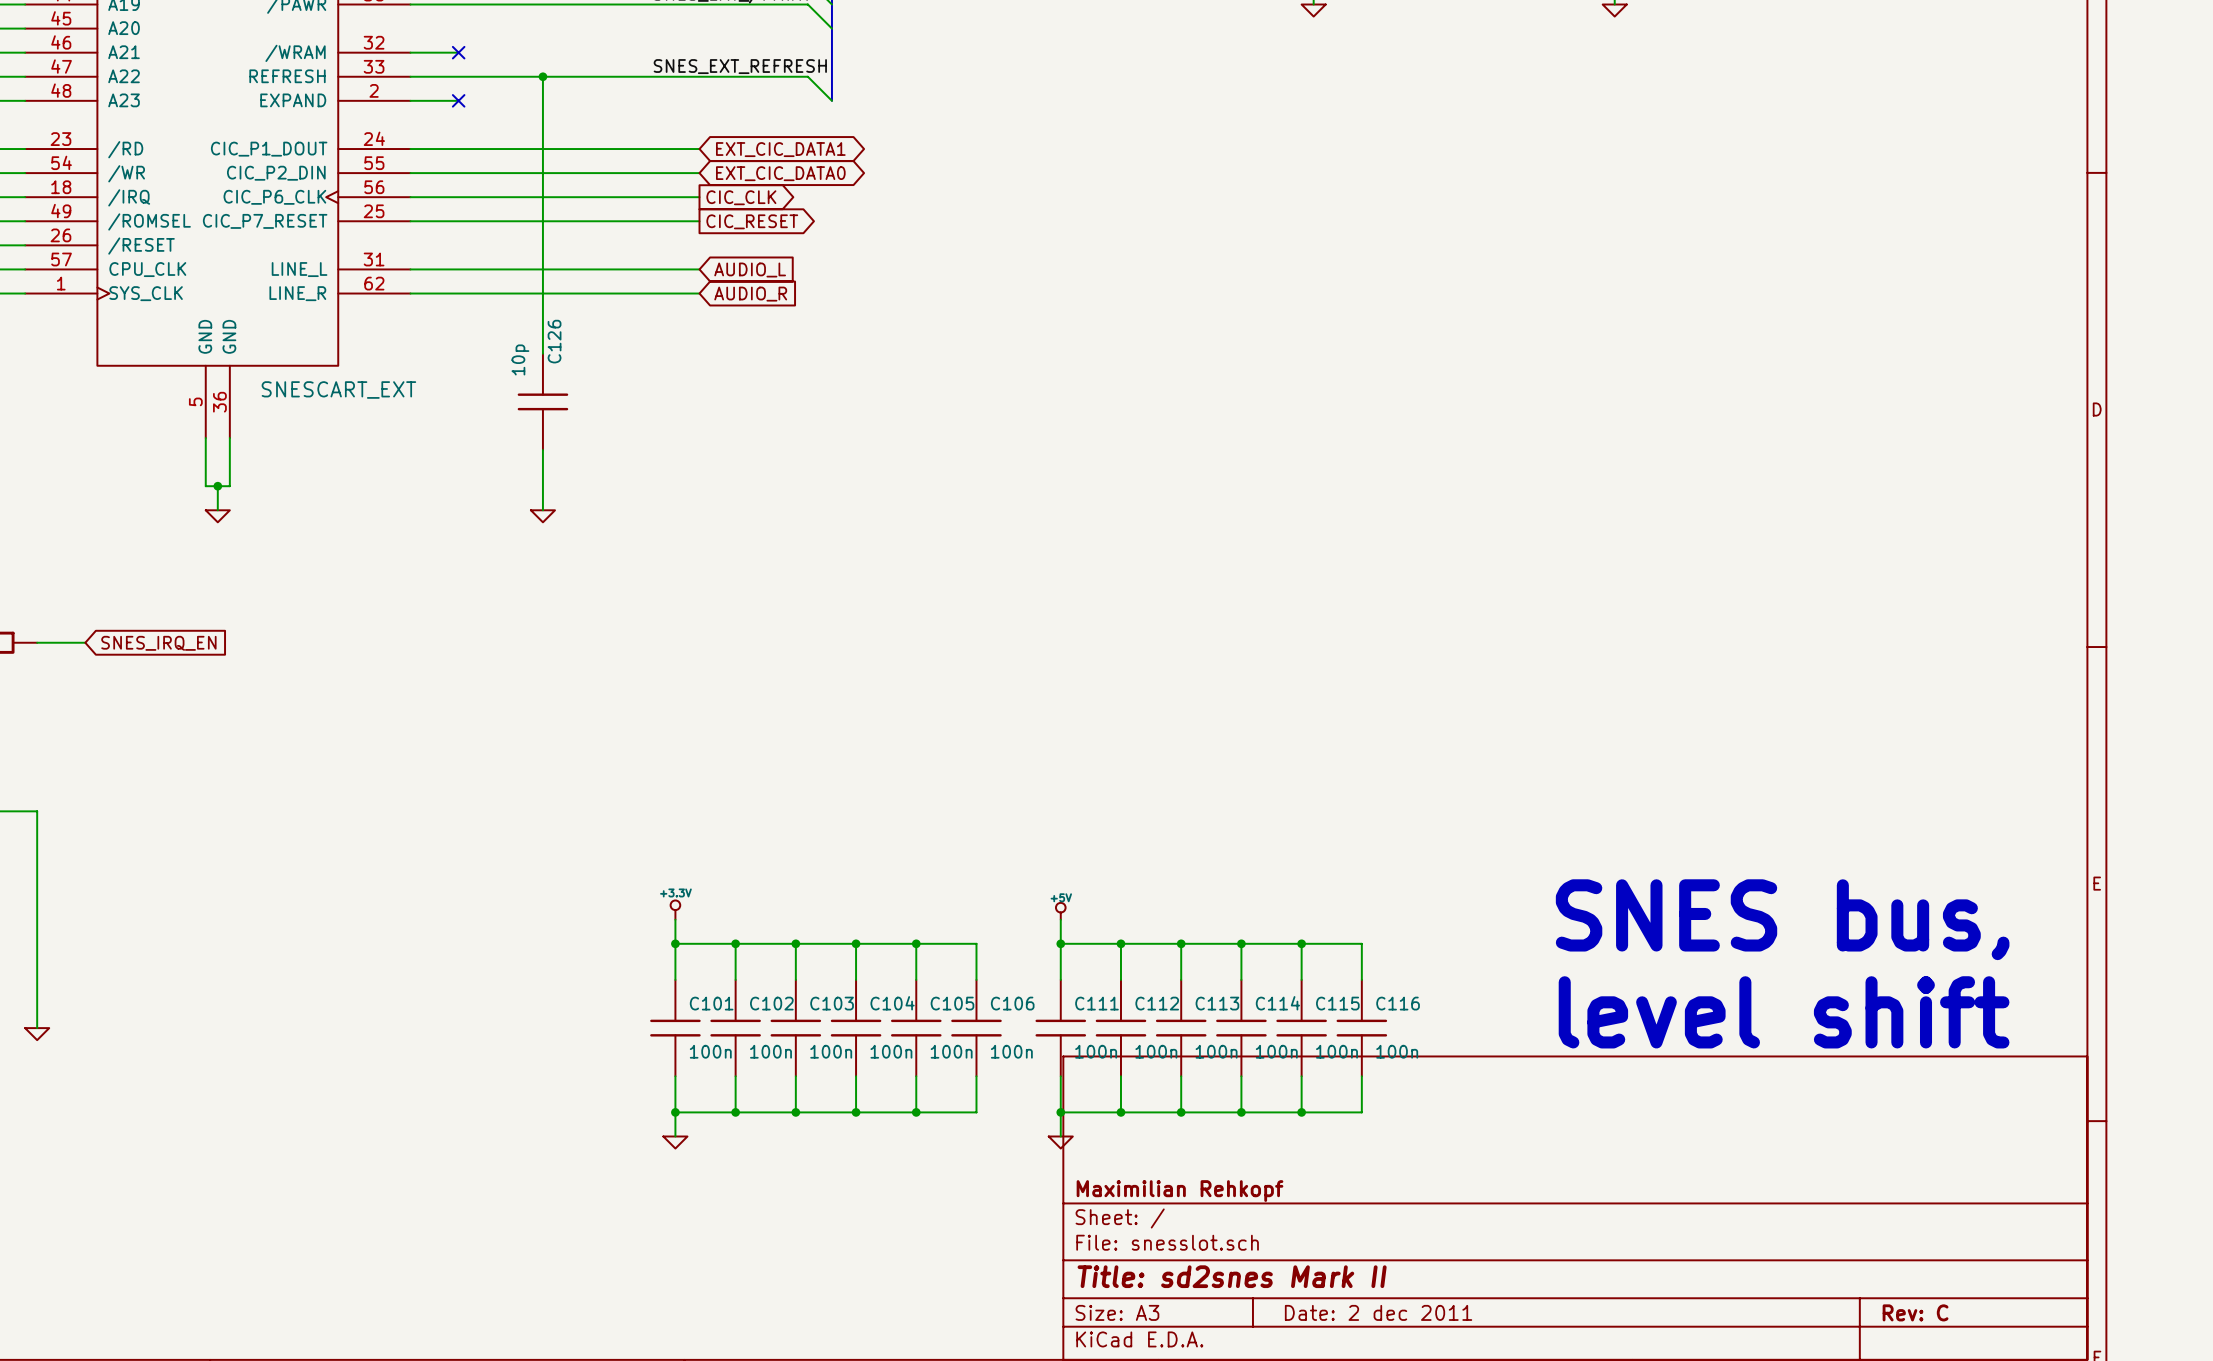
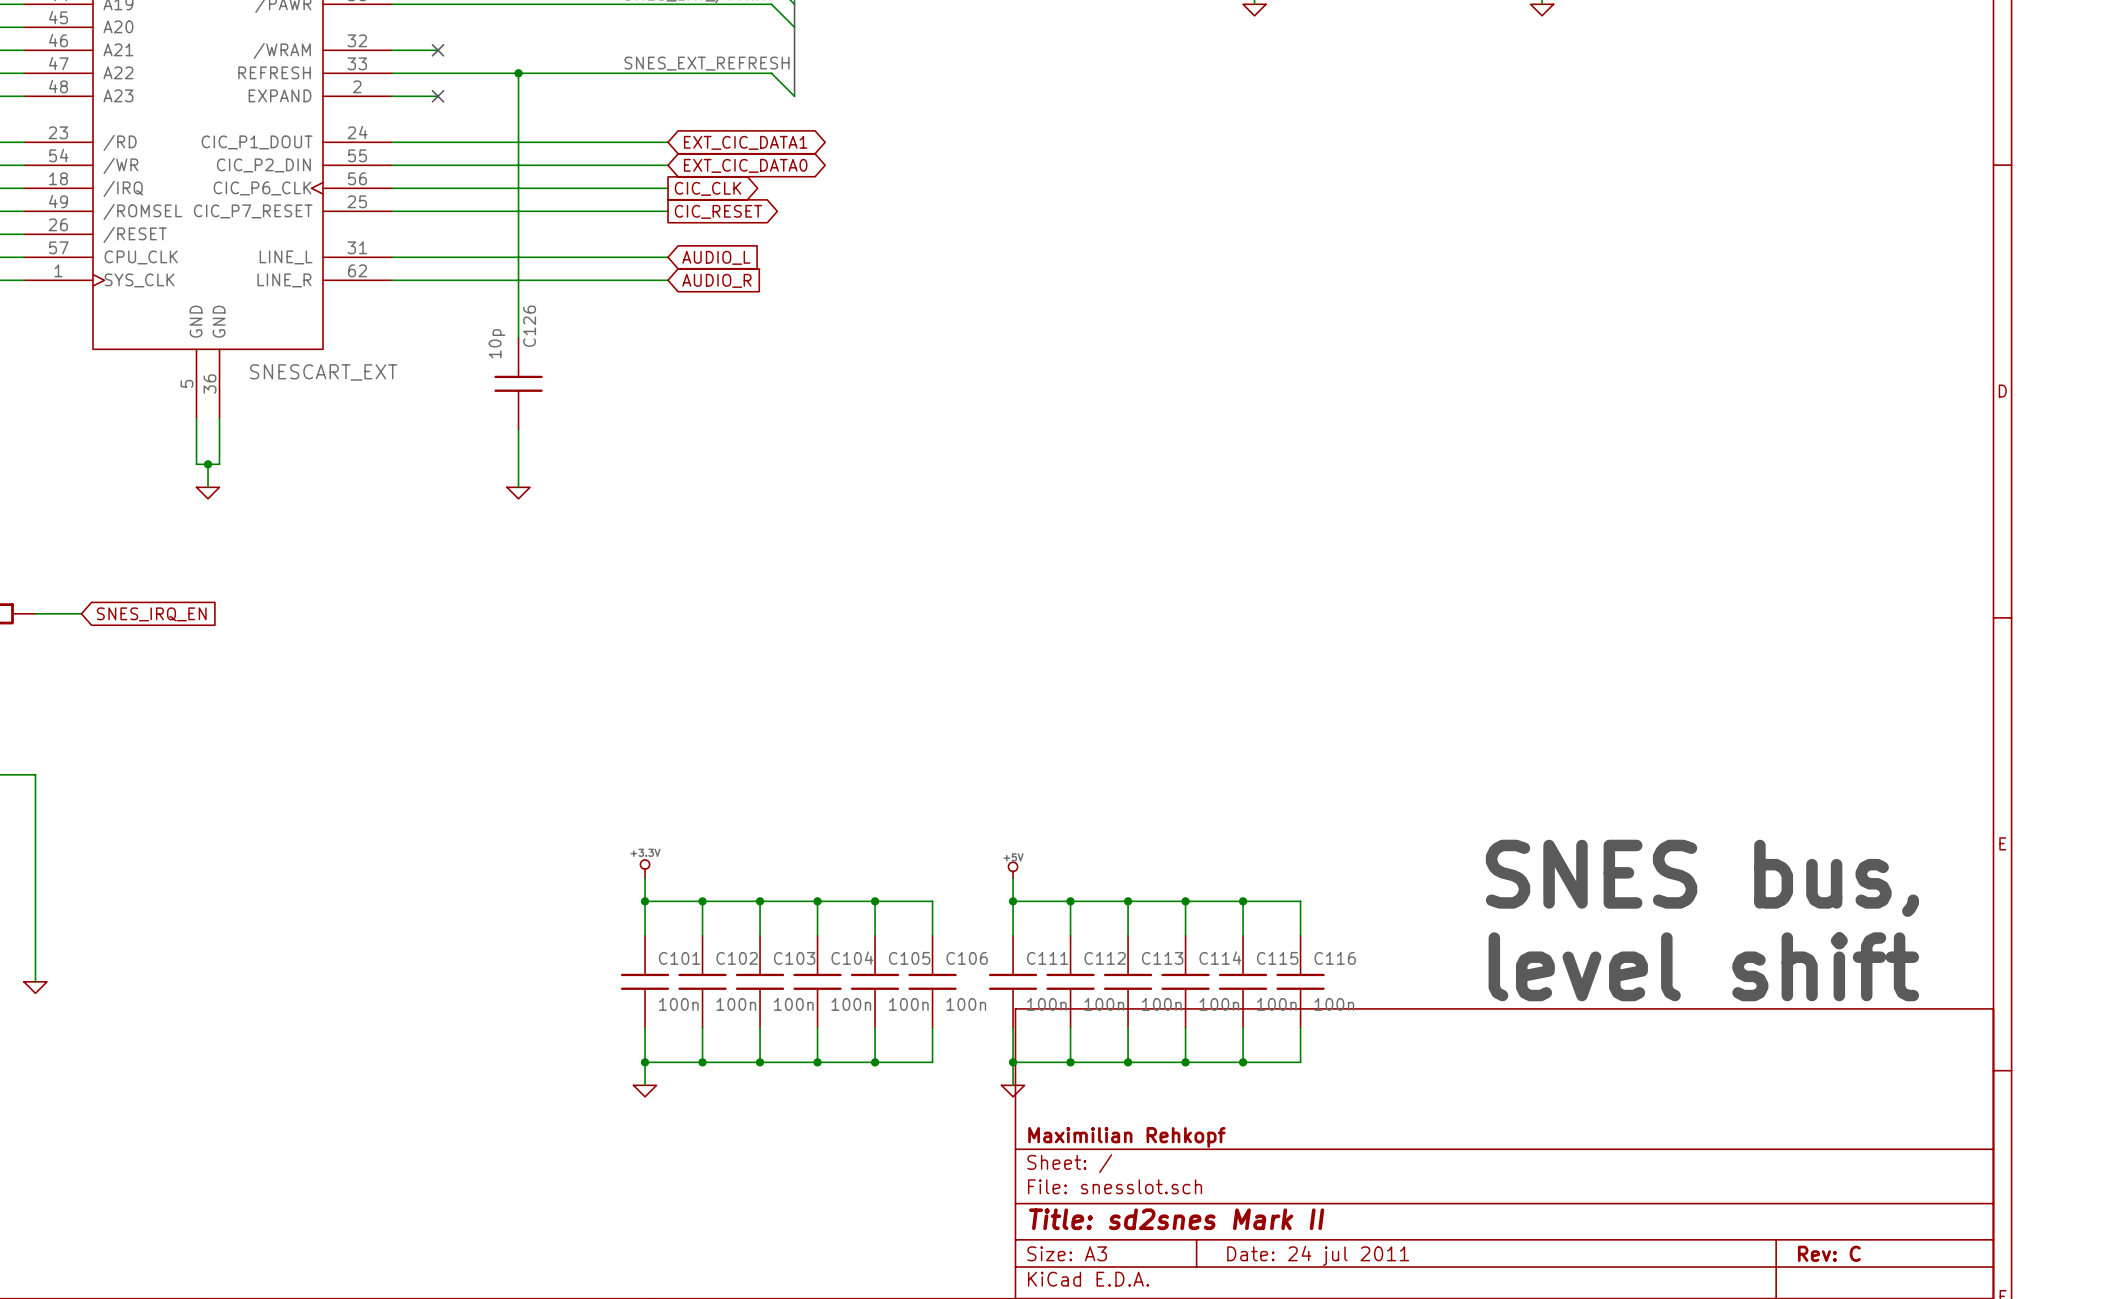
title block: Date: 2 dec 2011 (1378, 1312) -> Date: 24 jul 2011 (1318, 1255)

